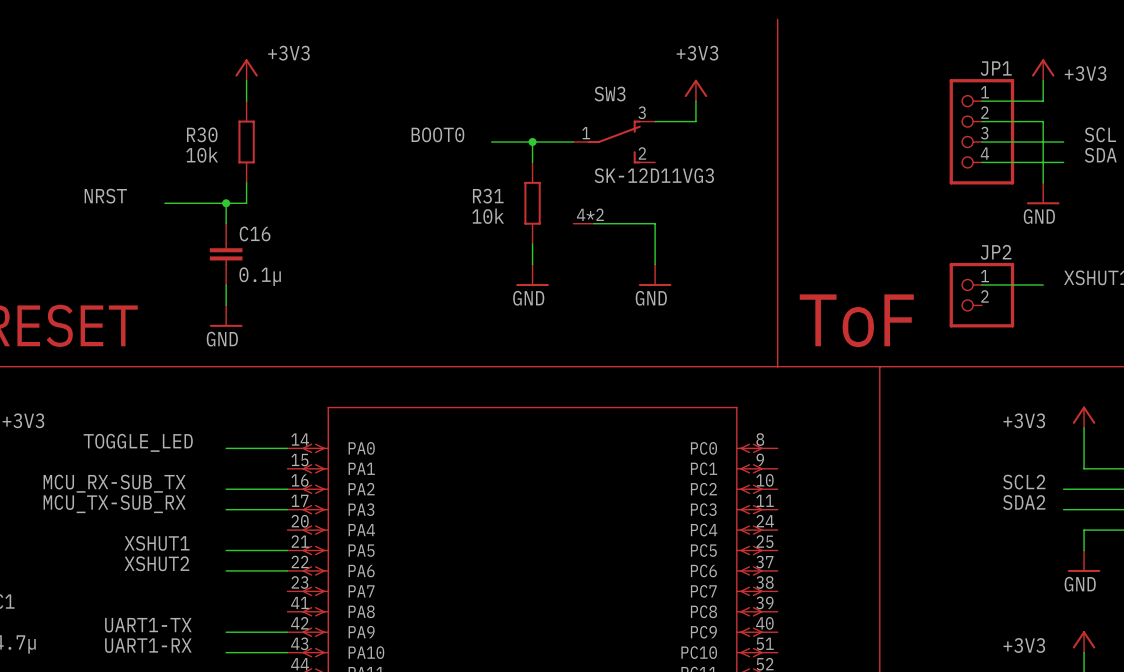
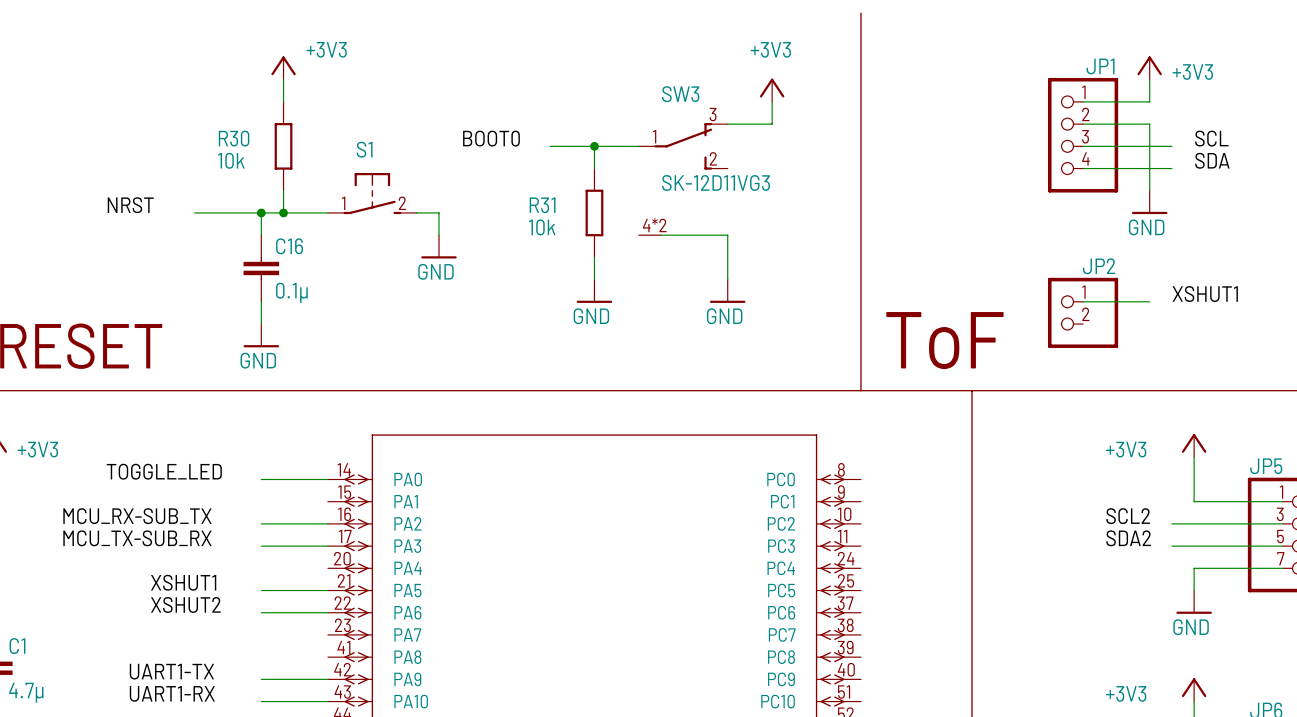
S1: none -> (372, 193)
wire: none -> (283, 212) (327, 212)
junction: none -> (283, 212)
wire: none -> (416, 212) (439, 212) (439, 235)
power symbol: none -> GND (439, 246)

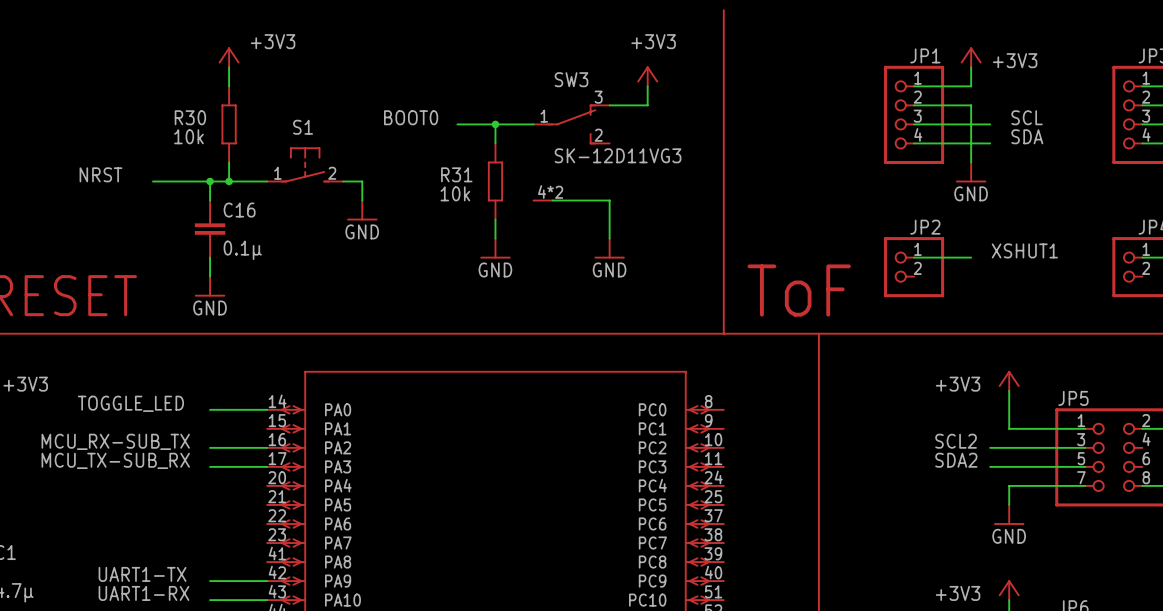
label: XSHUT1 (183, 582) -> none
wire: (261, 590) (327, 590) -> none
label: XSHUT2 (185, 604) -> none
wire: (261, 612) (327, 612) -> none

